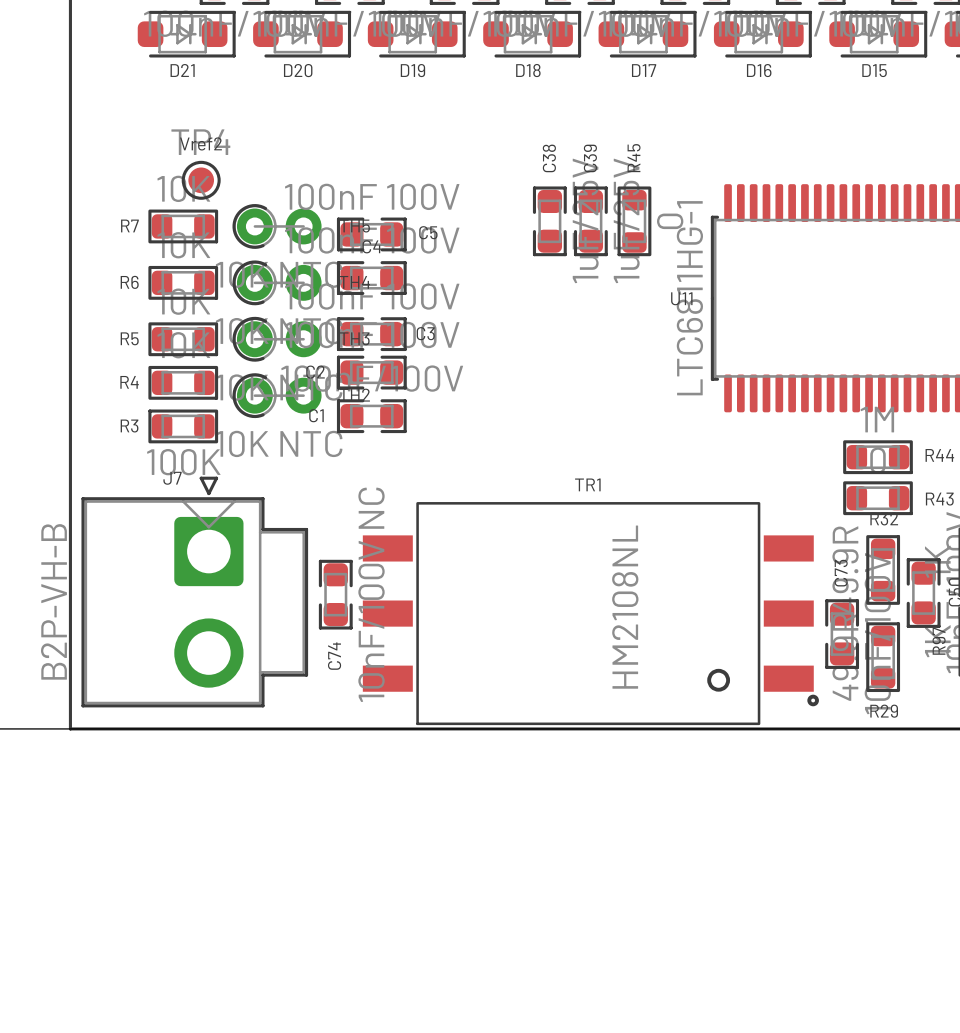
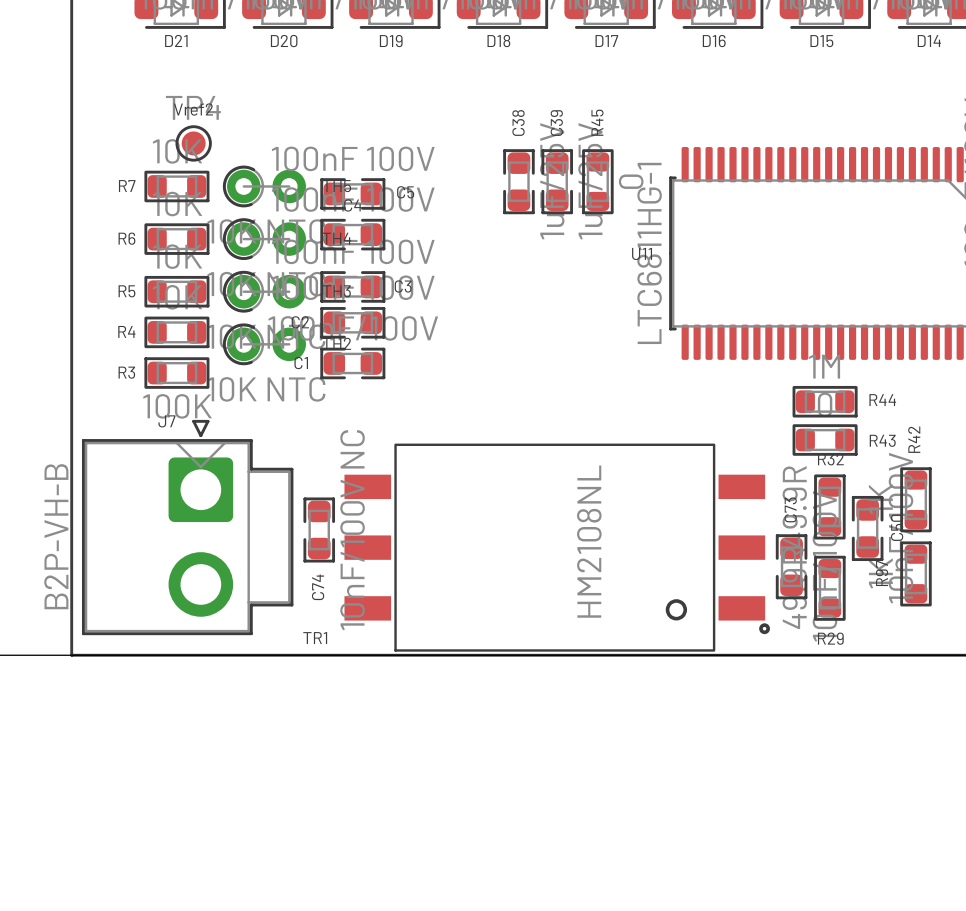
TR1 name position: TR1 (587, 484) -> TR1 (315, 638)

